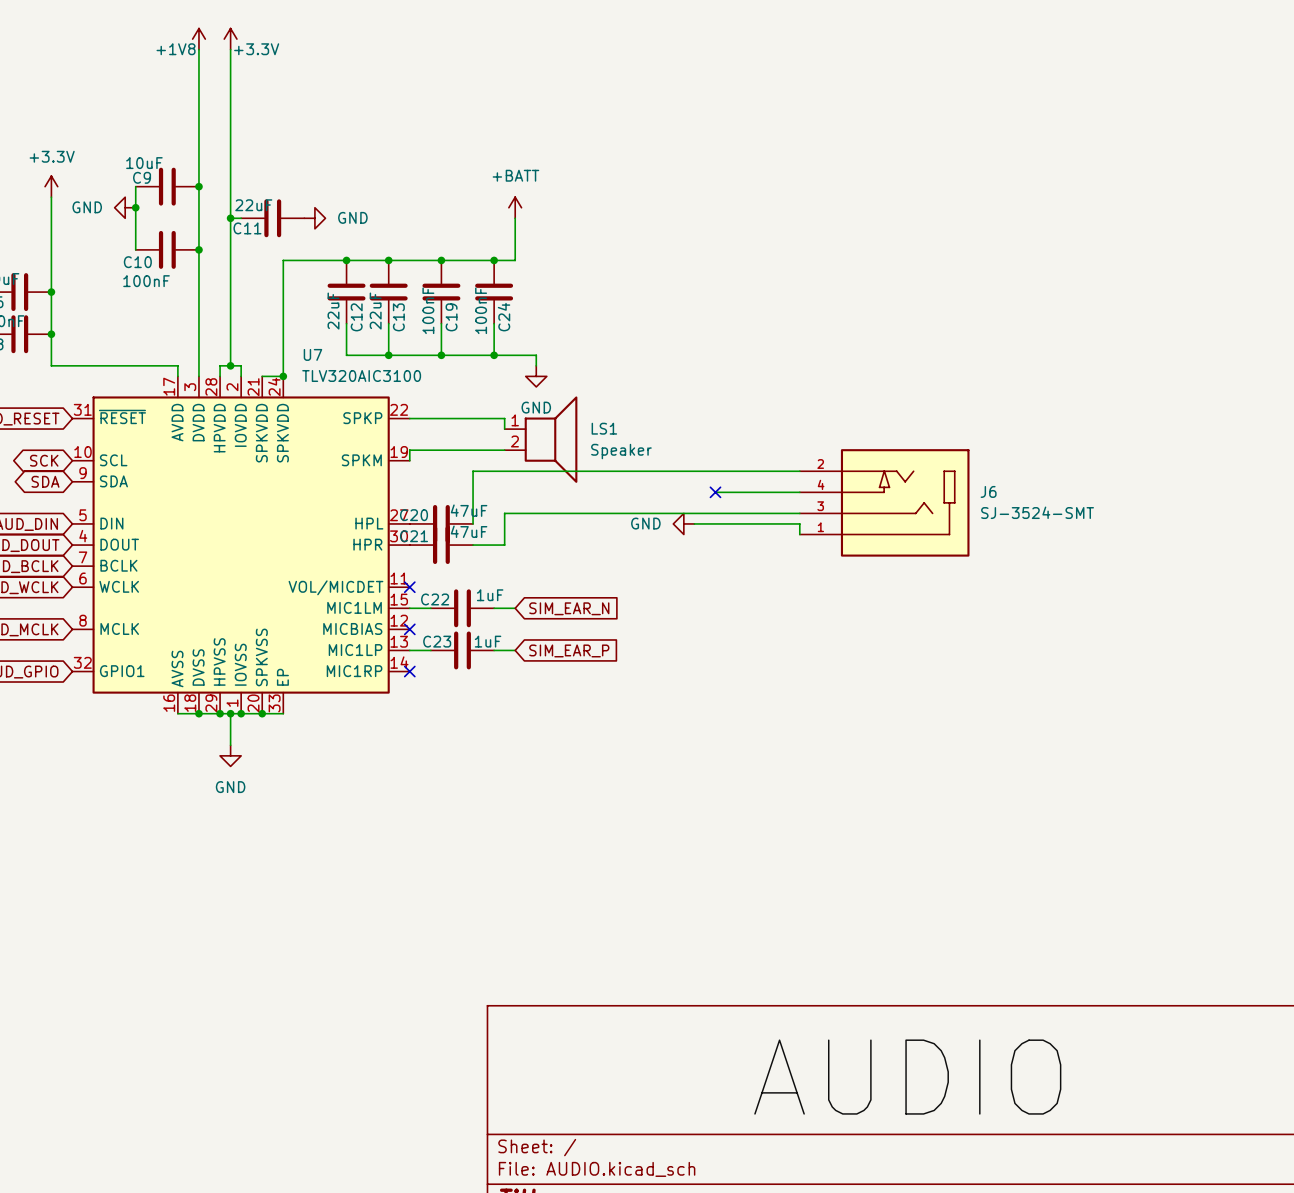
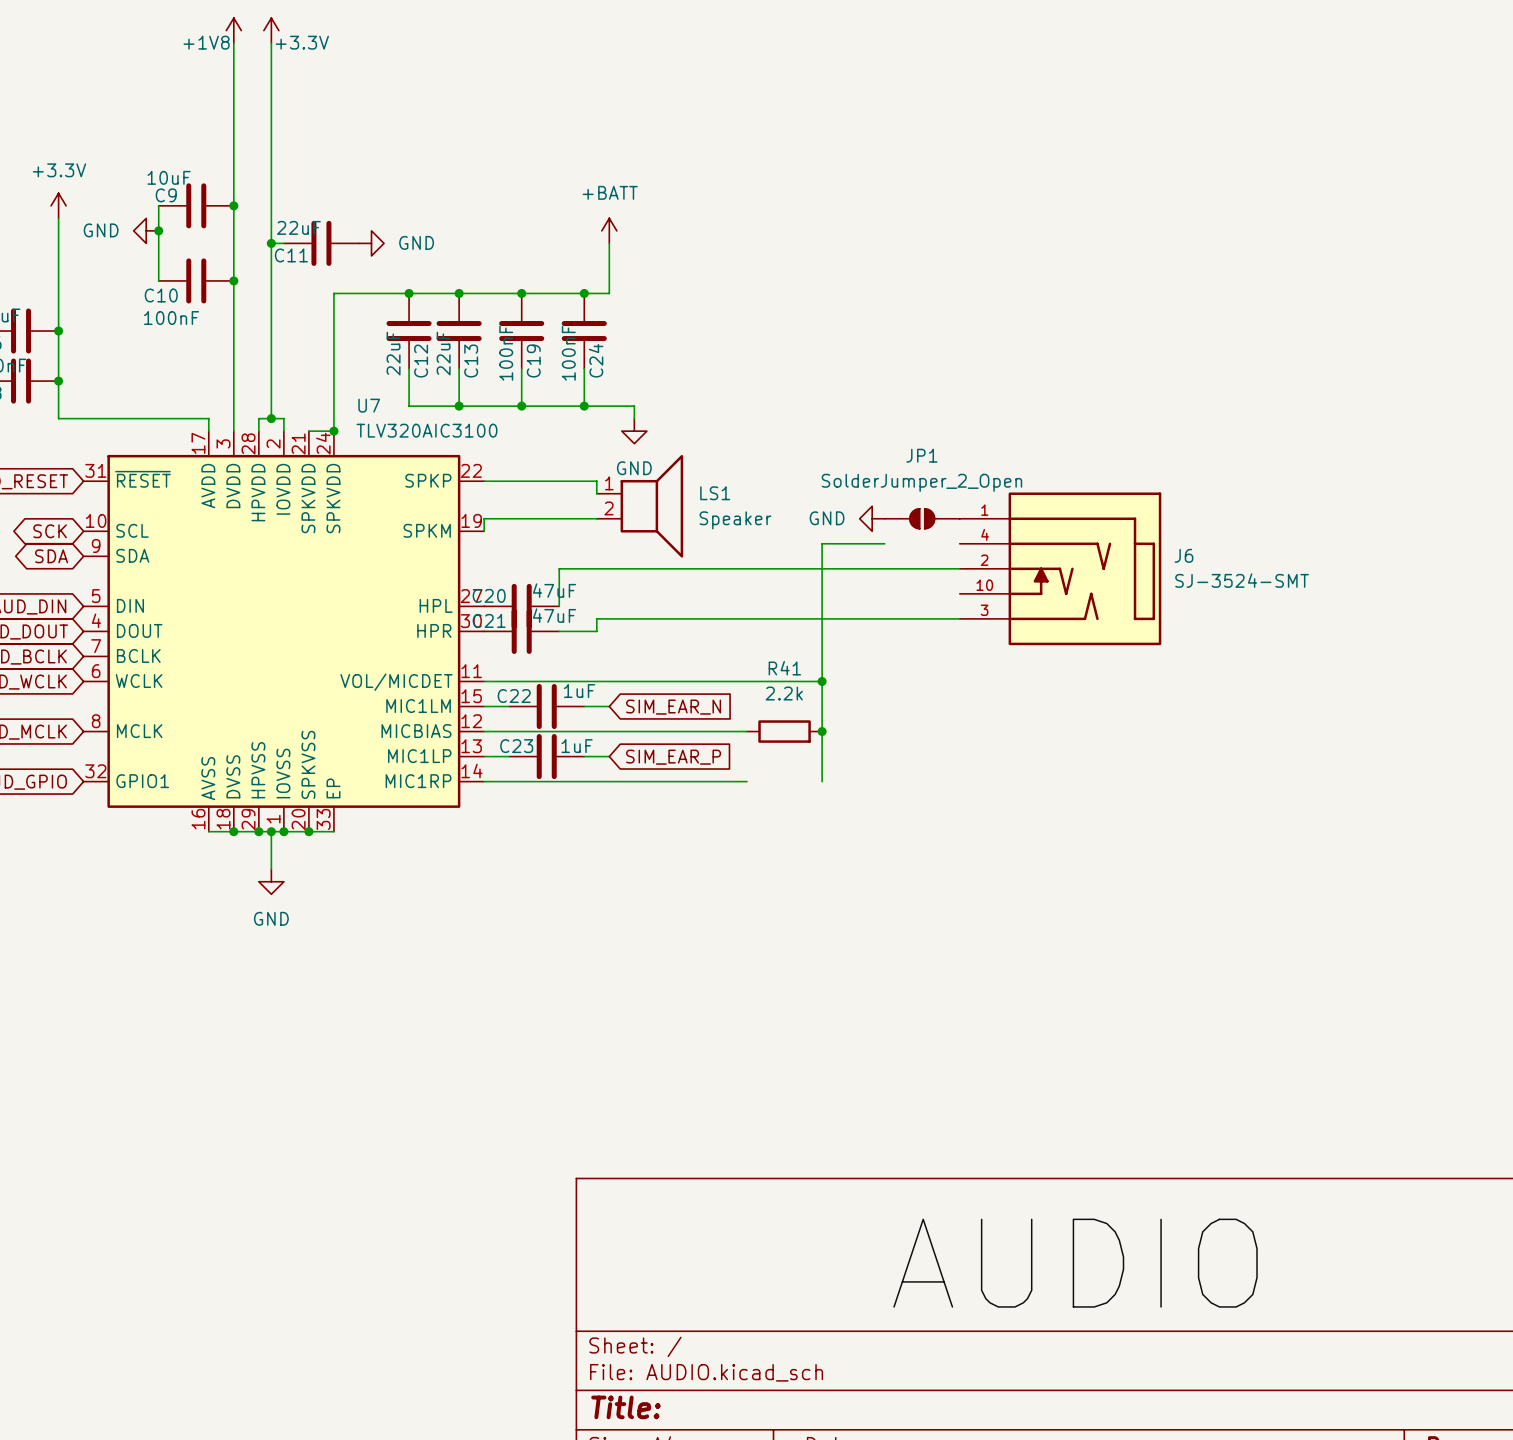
J6 symbol: [799, 449, 970, 557] -> [959, 492, 1162, 646]
JP1: none -> SolderJumper_2_Open (922, 518)
wire: (694, 471) (473, 471) (473, 492) -> (847, 568) (559, 568)
wire: none -> (822, 543) (822, 781)
wire: (747, 471) (799, 471) -> none
no-connect mark: (715, 492) -> none
wire: (799, 513) (504, 513) (504, 534) -> (959, 618) (596, 618)
power symbol position: GND (683, 523) -> GND (872, 518)
wire: (694, 523) (799, 523) (799, 534) -> none
wire: none -> (484, 681) (822, 681)
no-connect mark: (409, 587) -> none
junction: none -> (822, 681)
wire: none -> (484, 731) (747, 731)
no-connect mark: (409, 629) -> none
R41: none -> 2.2k (784, 731)
junction: none -> (822, 731)
wire: none -> (484, 781) (747, 781)
no-connect mark: (409, 671) -> none

